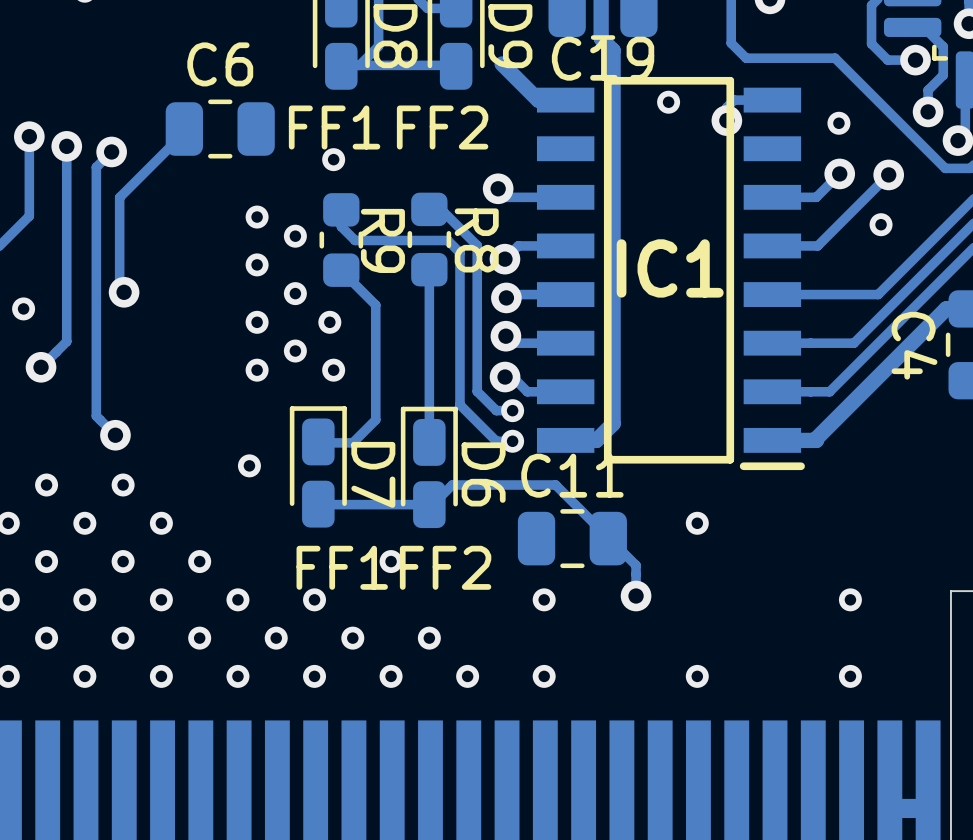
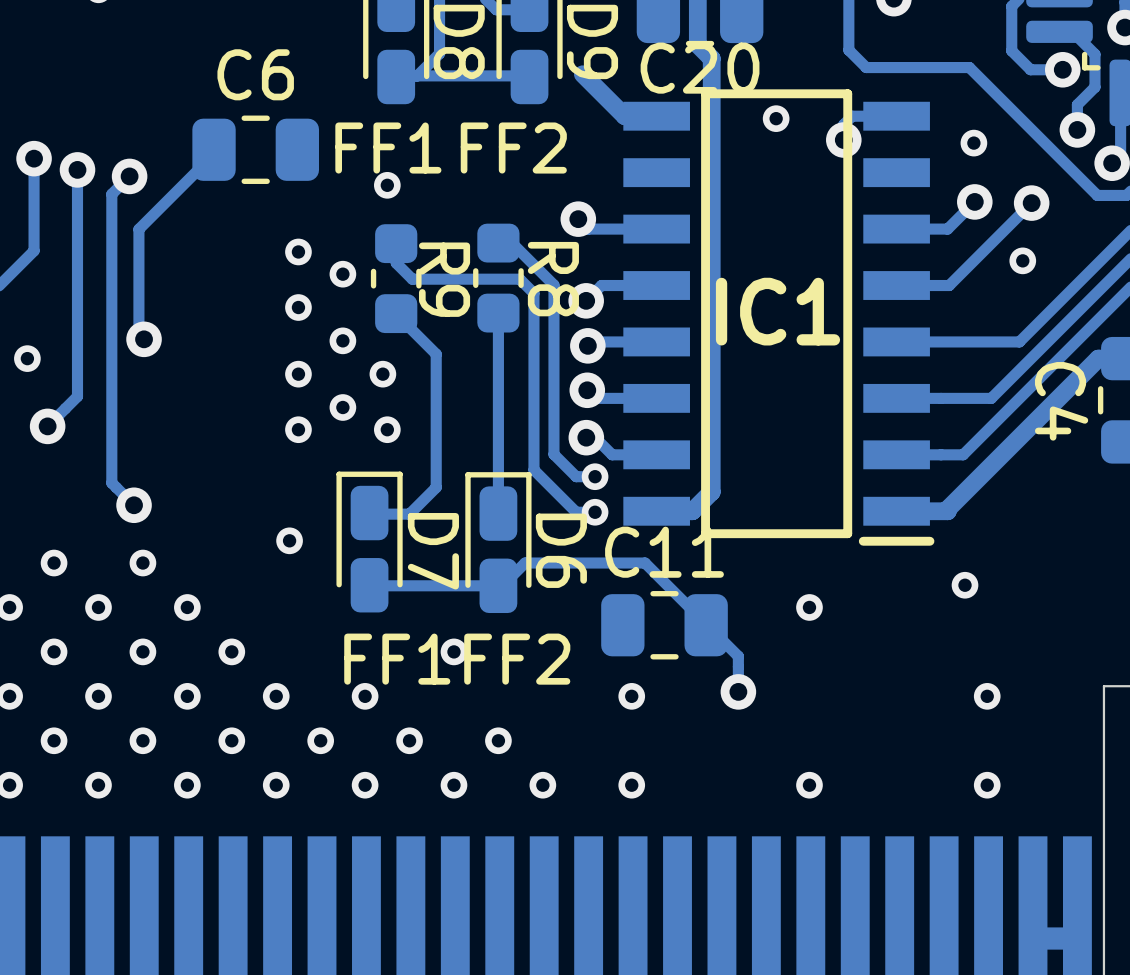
C19 name: C19 (603, 58) -> C20 (700, 68)
via: none -> (965, 585)

